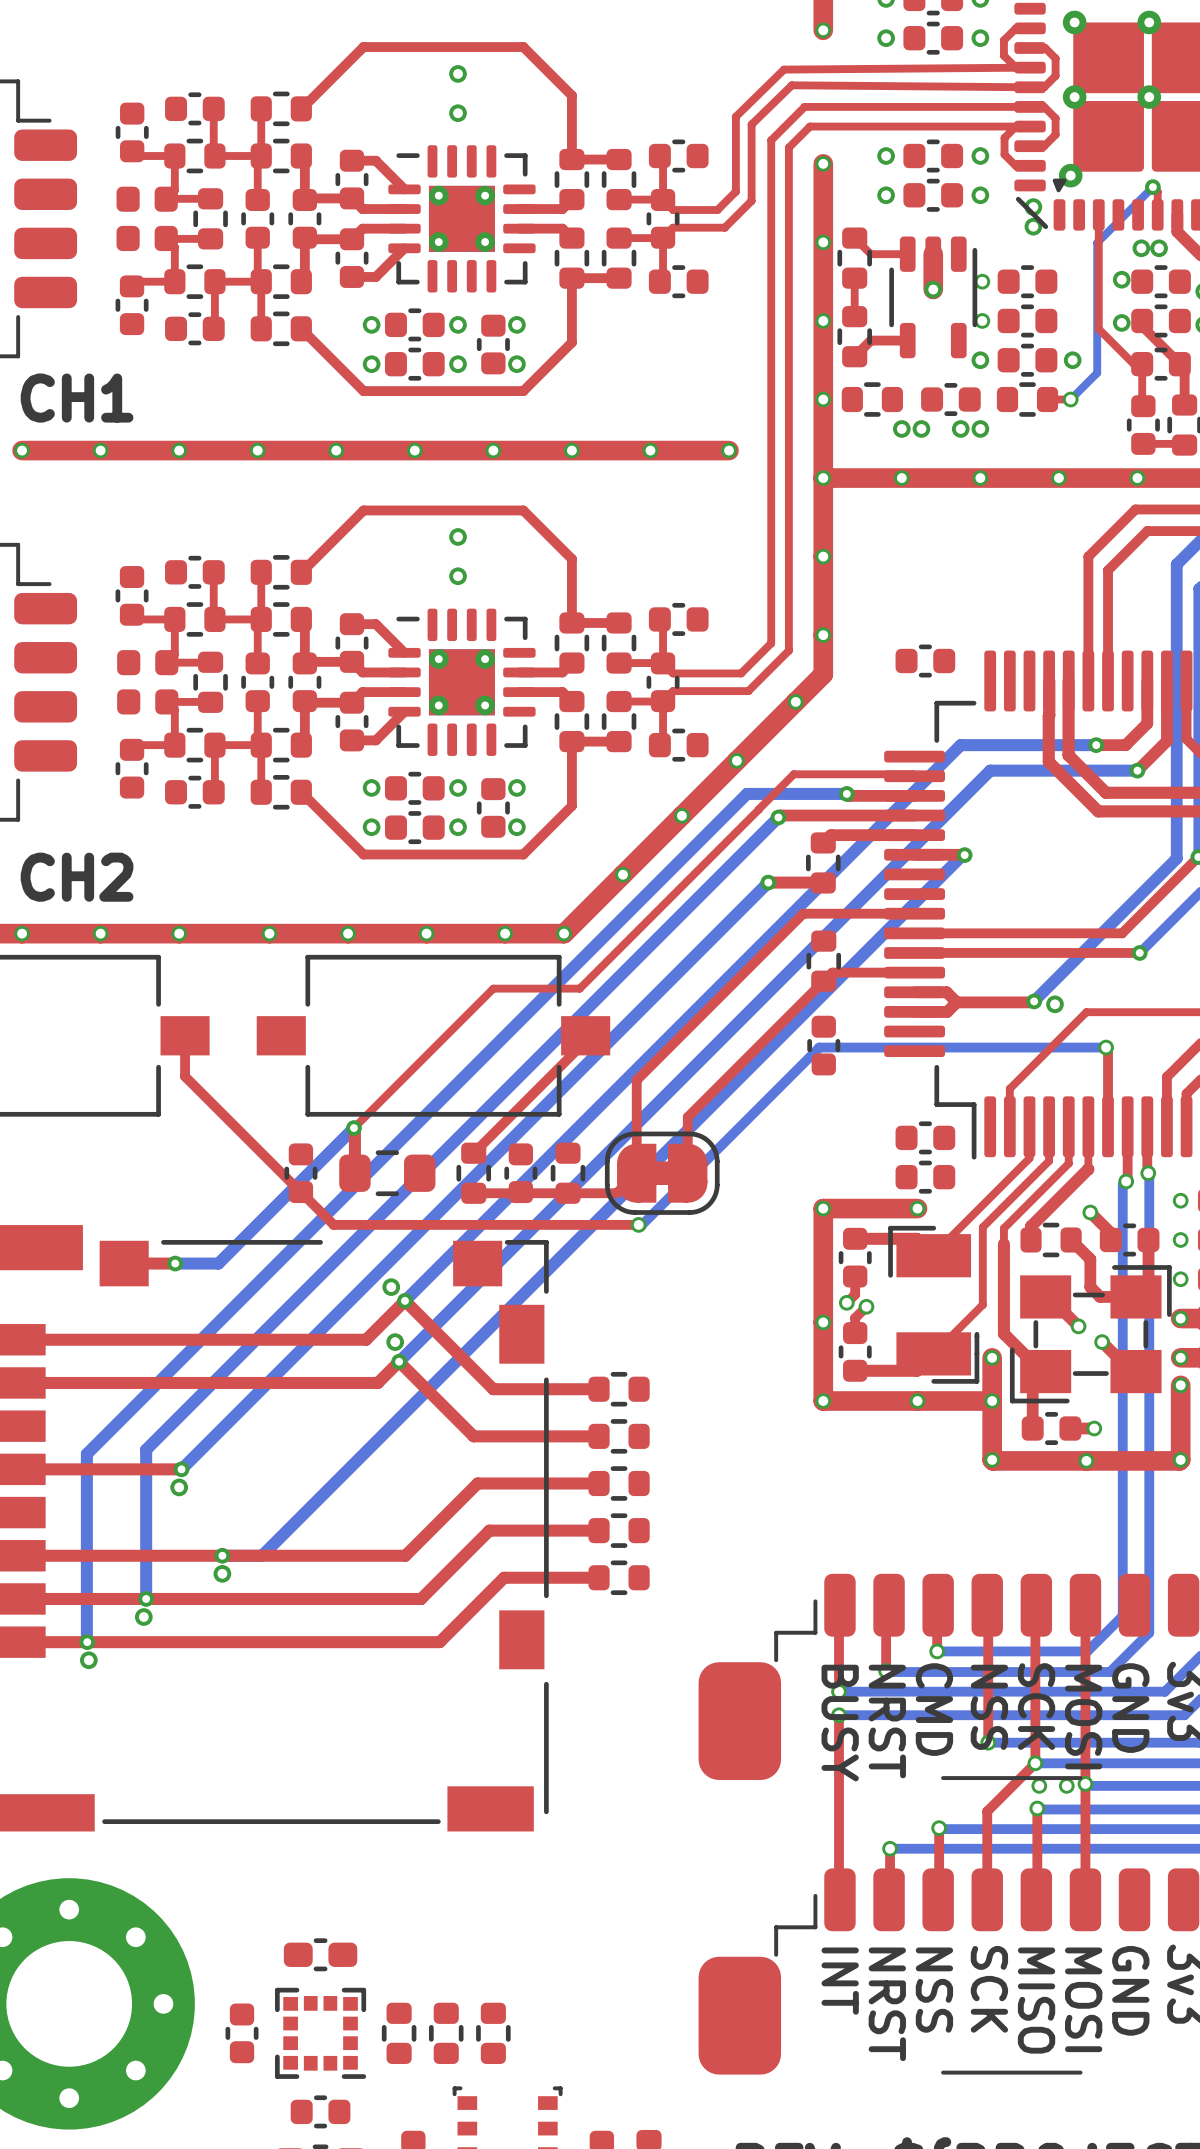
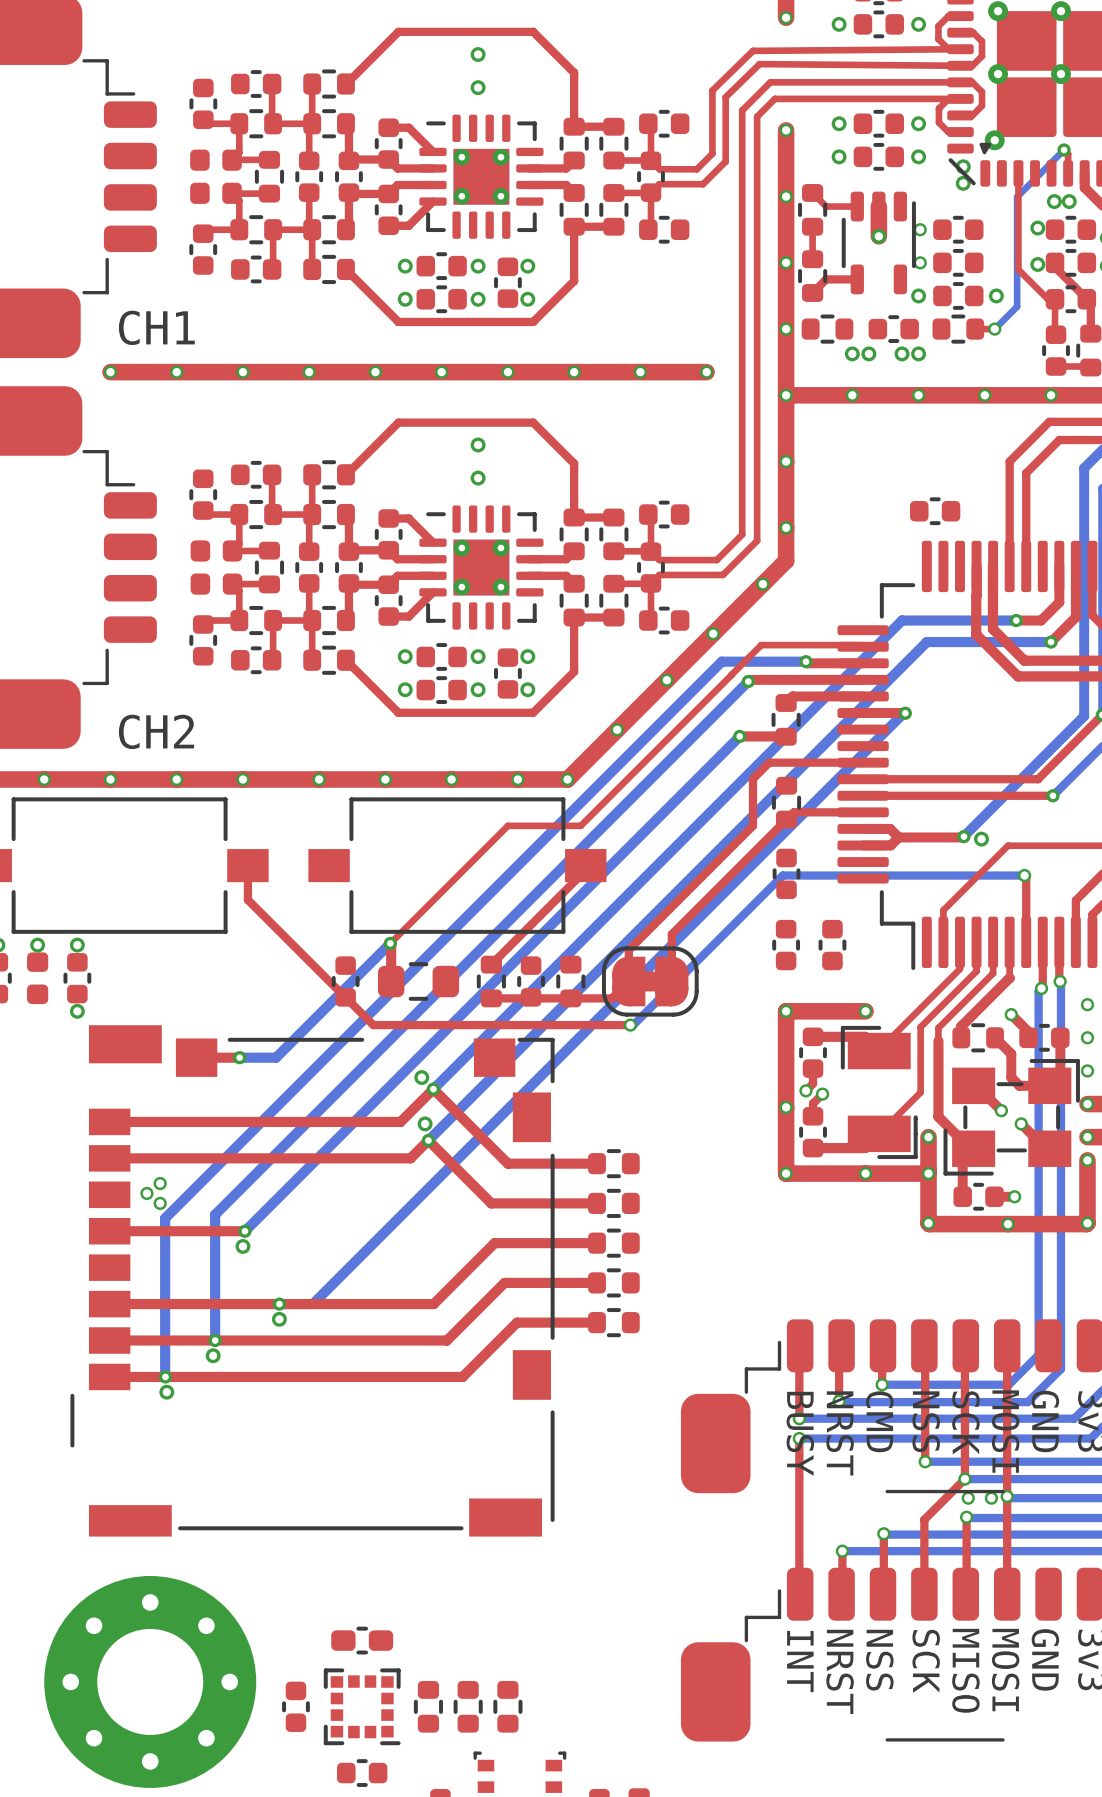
part position: (925, 661) -> (935, 511)
top track: (784, 932) (636, 1080) (636, 1135) -> (752, 778) (752, 825) (628, 950)
part: none -> (786, 945)
part: none -> (832, 945)
part: (925, 1137) -> none
part: (925, 1177) -> none
via: none -> (160, 1183)
via: none -> (146, 1193)
via: none -> (160, 1203)

